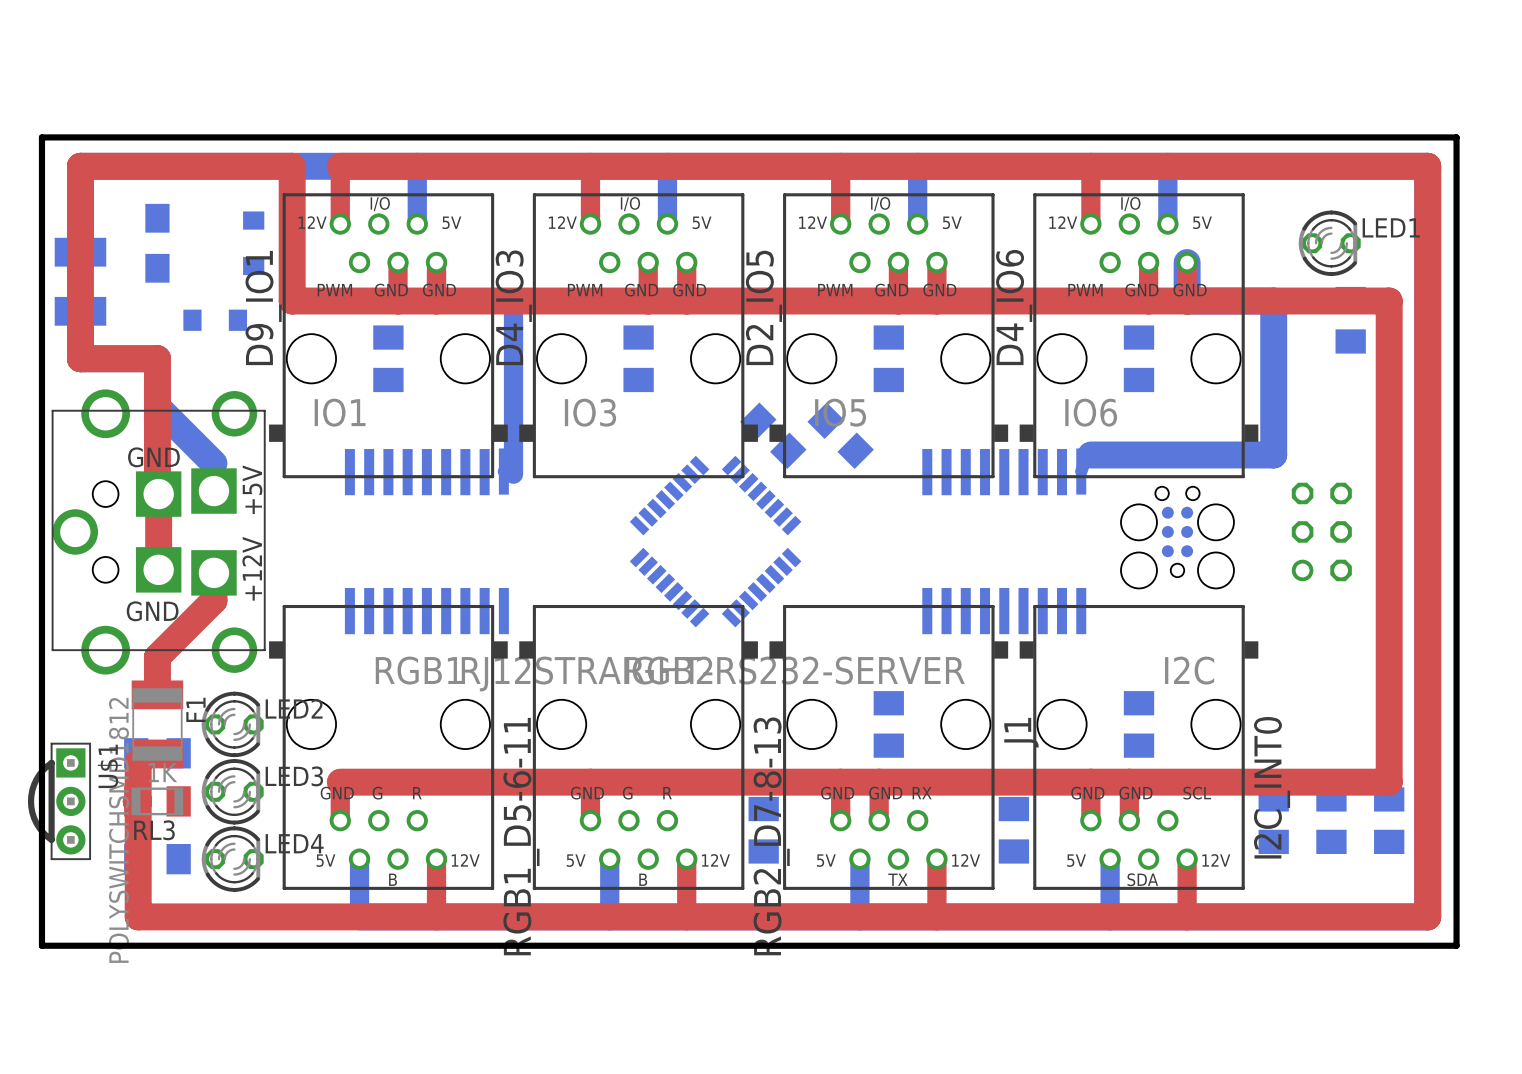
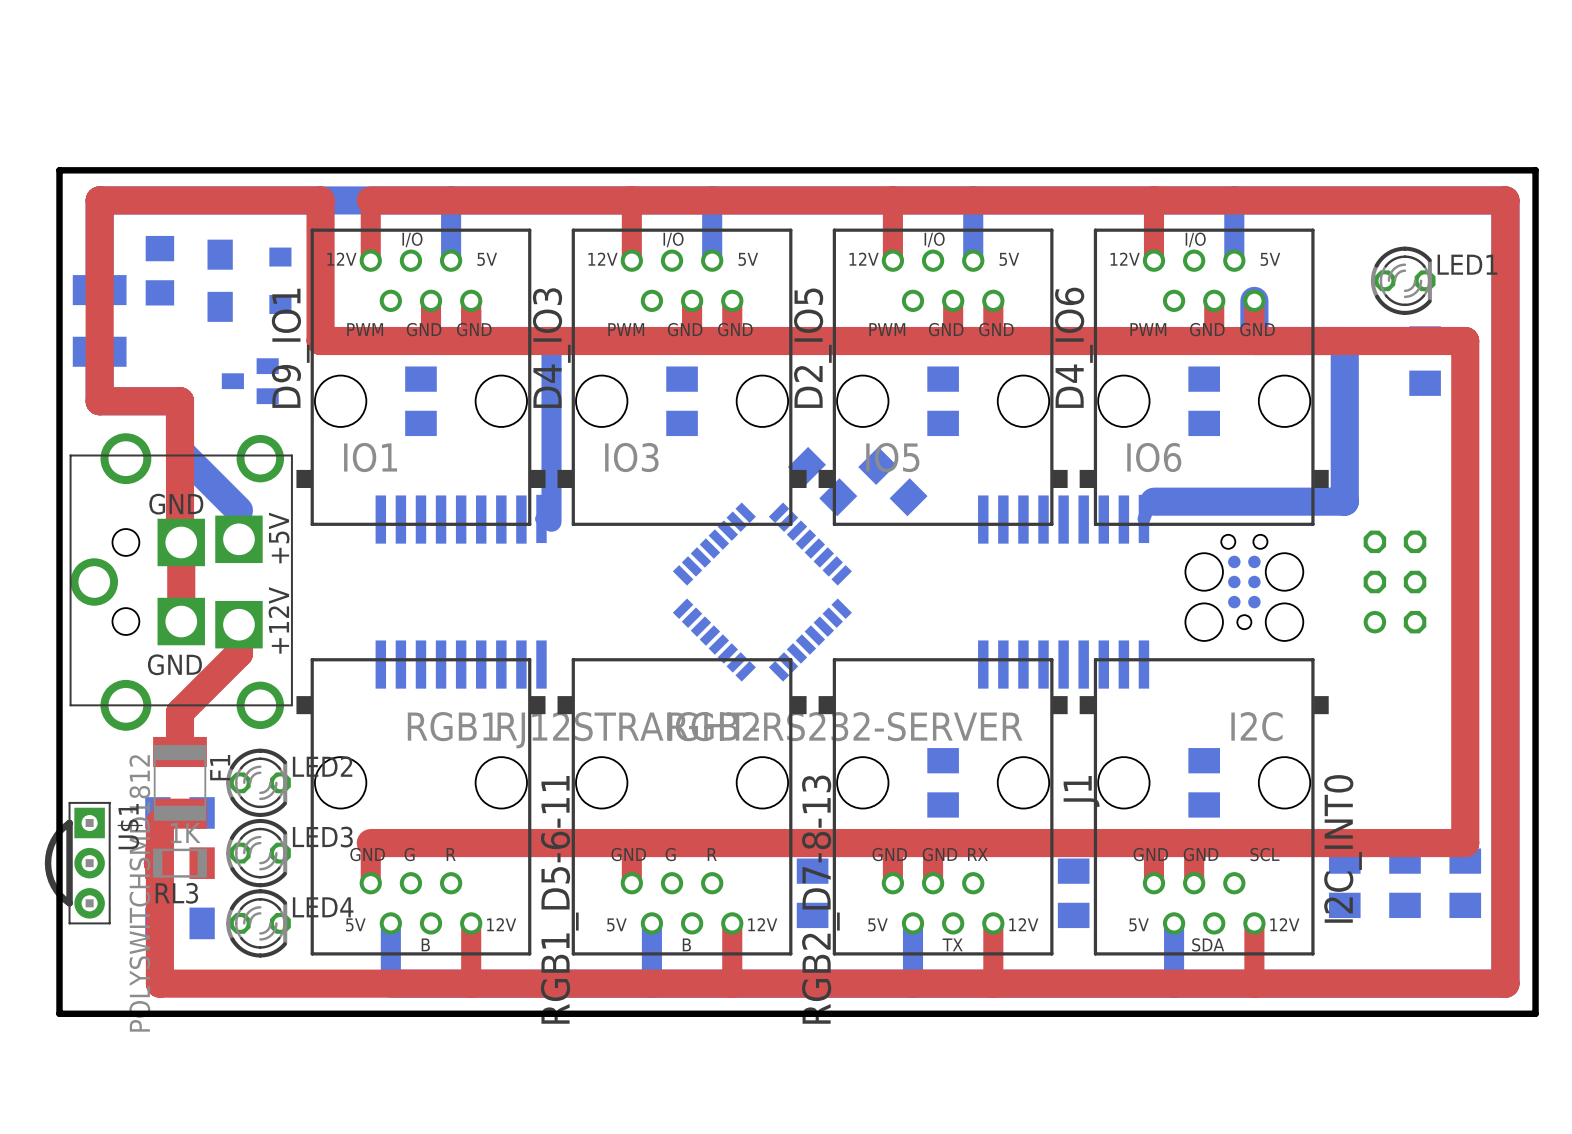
part: none -> (159, 270)
part position: (157, 243) -> (220, 280)
part: (215, 320) -> none
part: none -> (250, 381)

